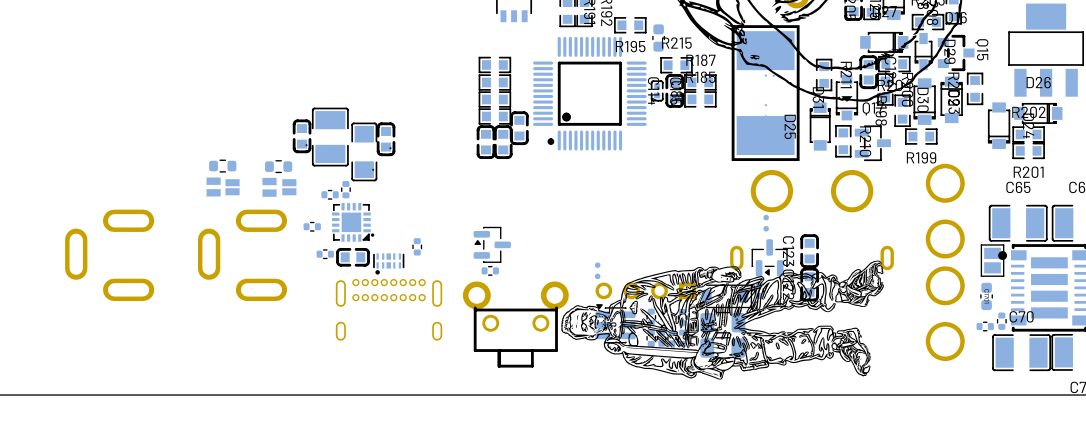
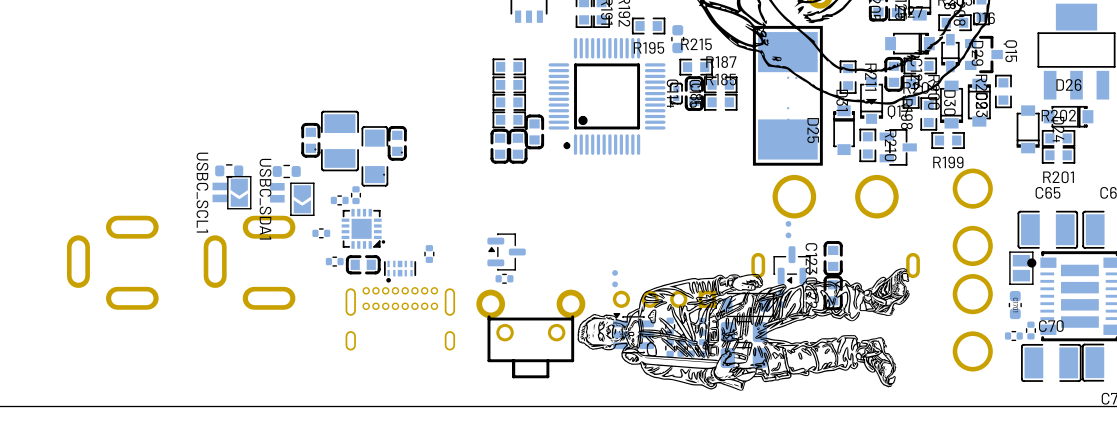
part: (232, 187) -> none
USBC_SCL1: none -> (239, 192)
part: (289, 187) -> none
USBC_SDA1: none -> (302, 199)

